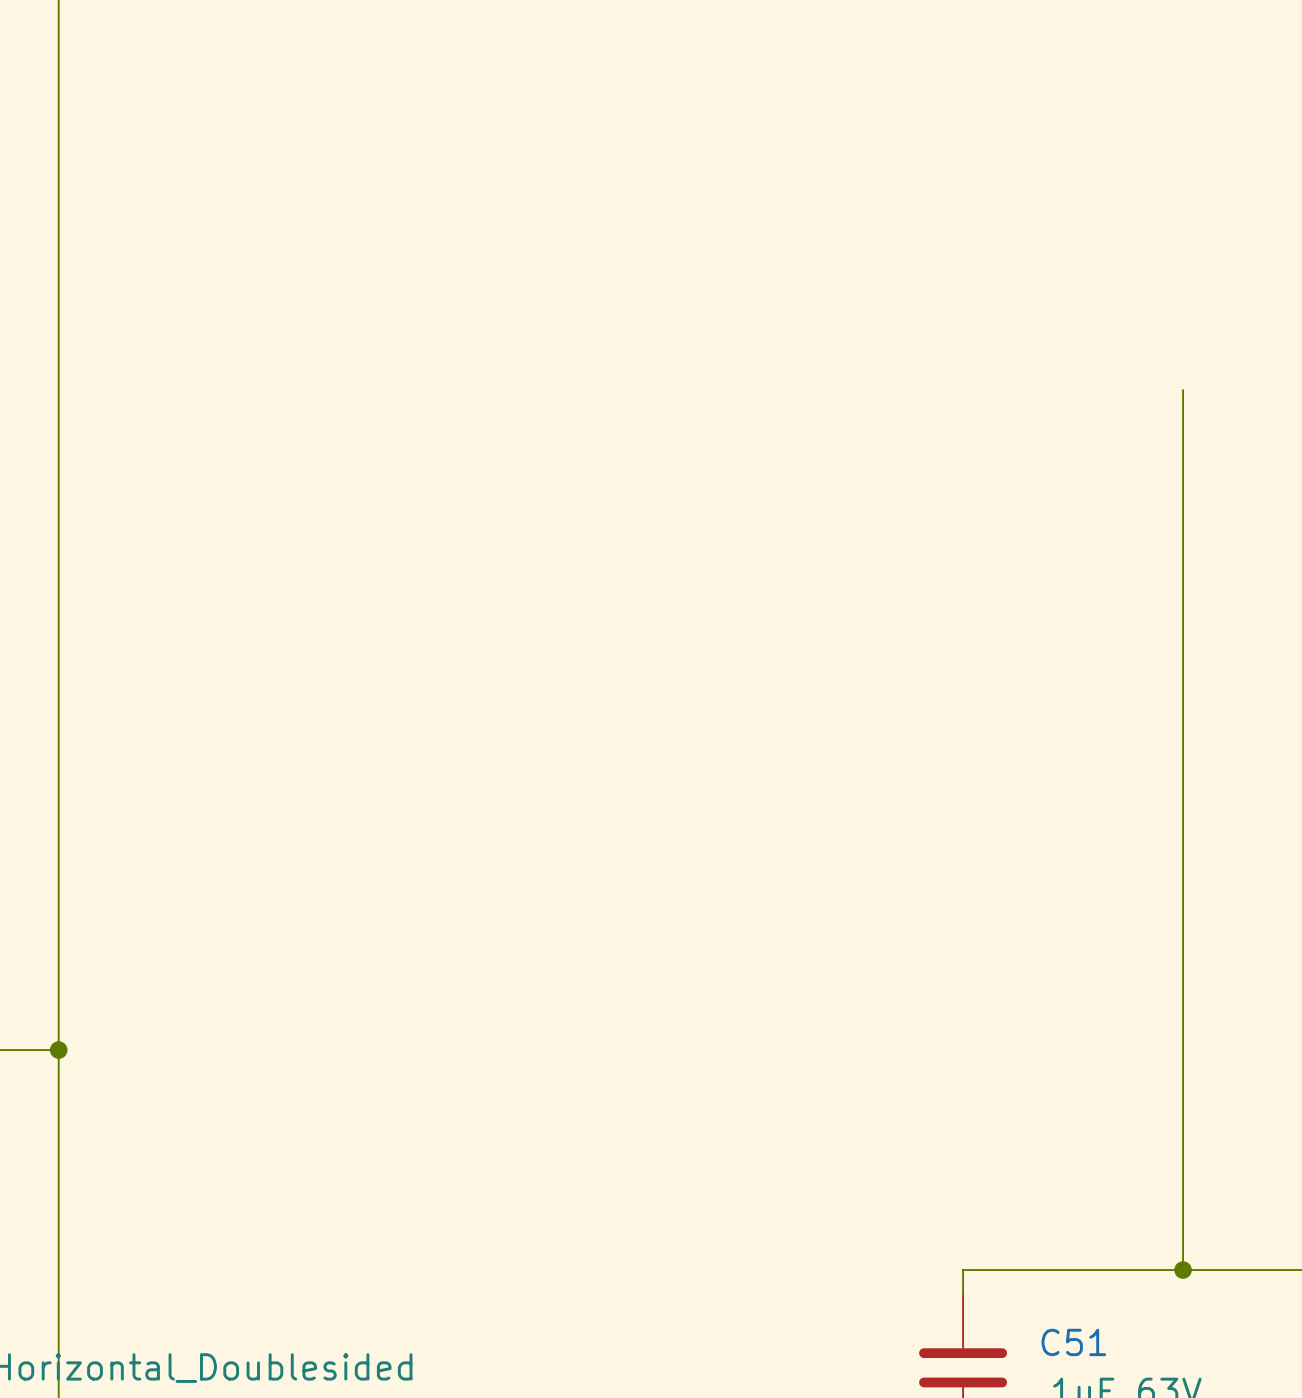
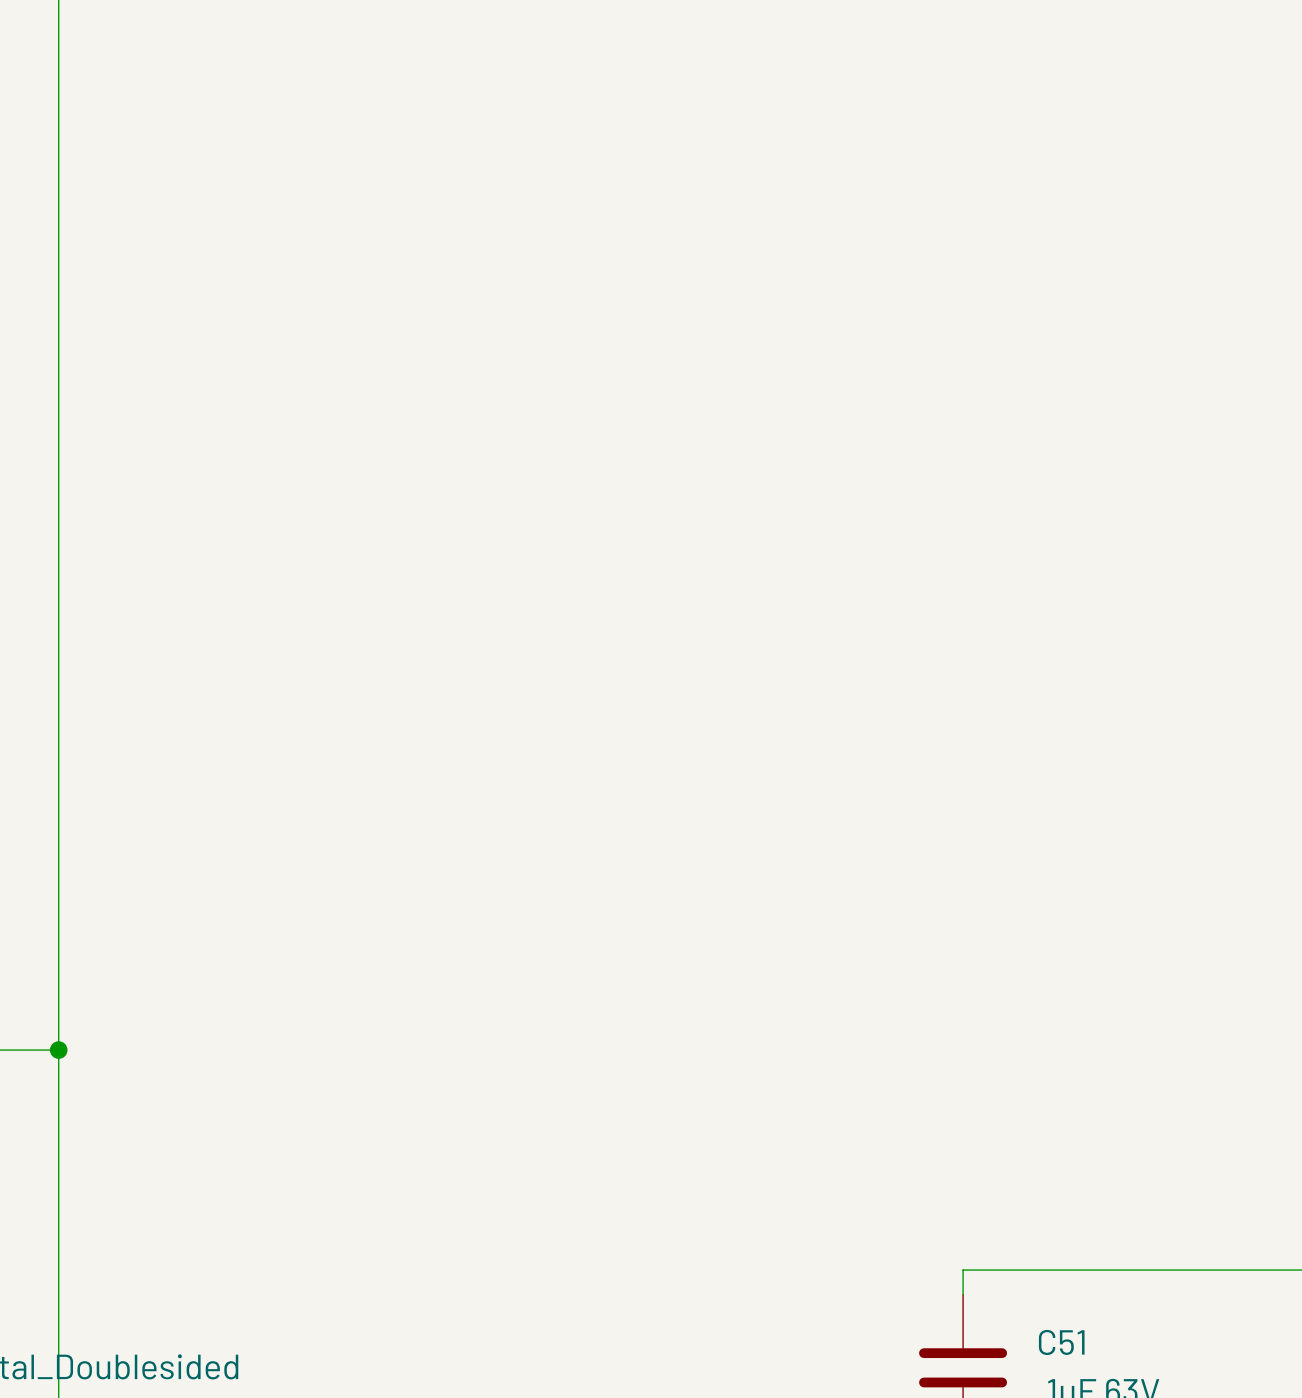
wire: (1183, 390) (1183, 1270) -> none
junction: (1183, 1270) -> none

